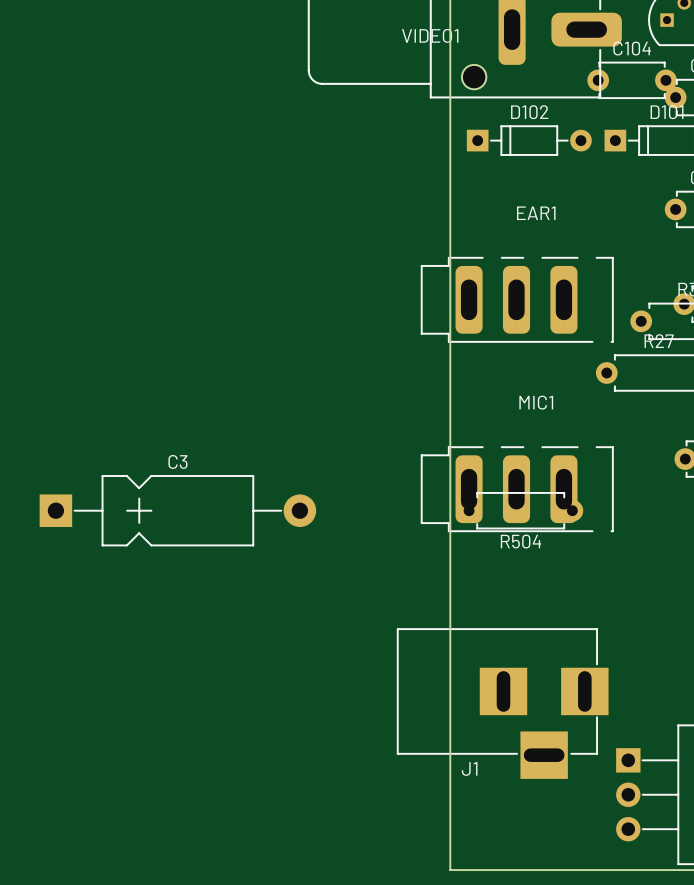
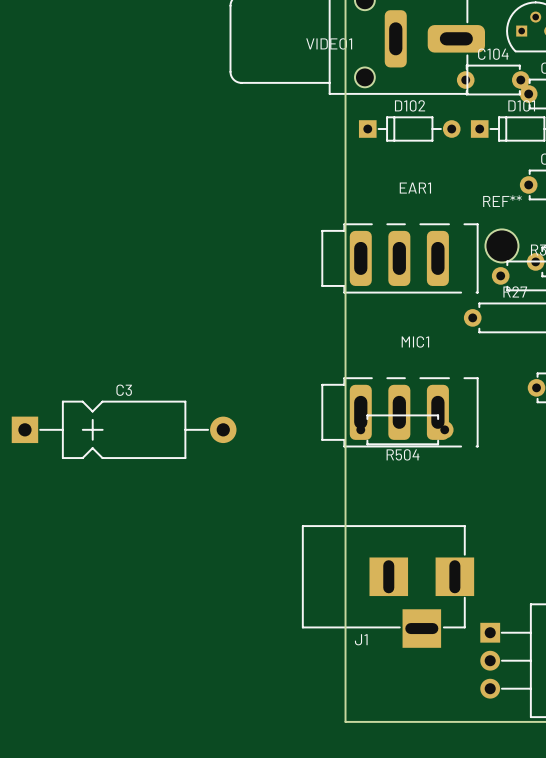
REF**: none -> (501, 245)

